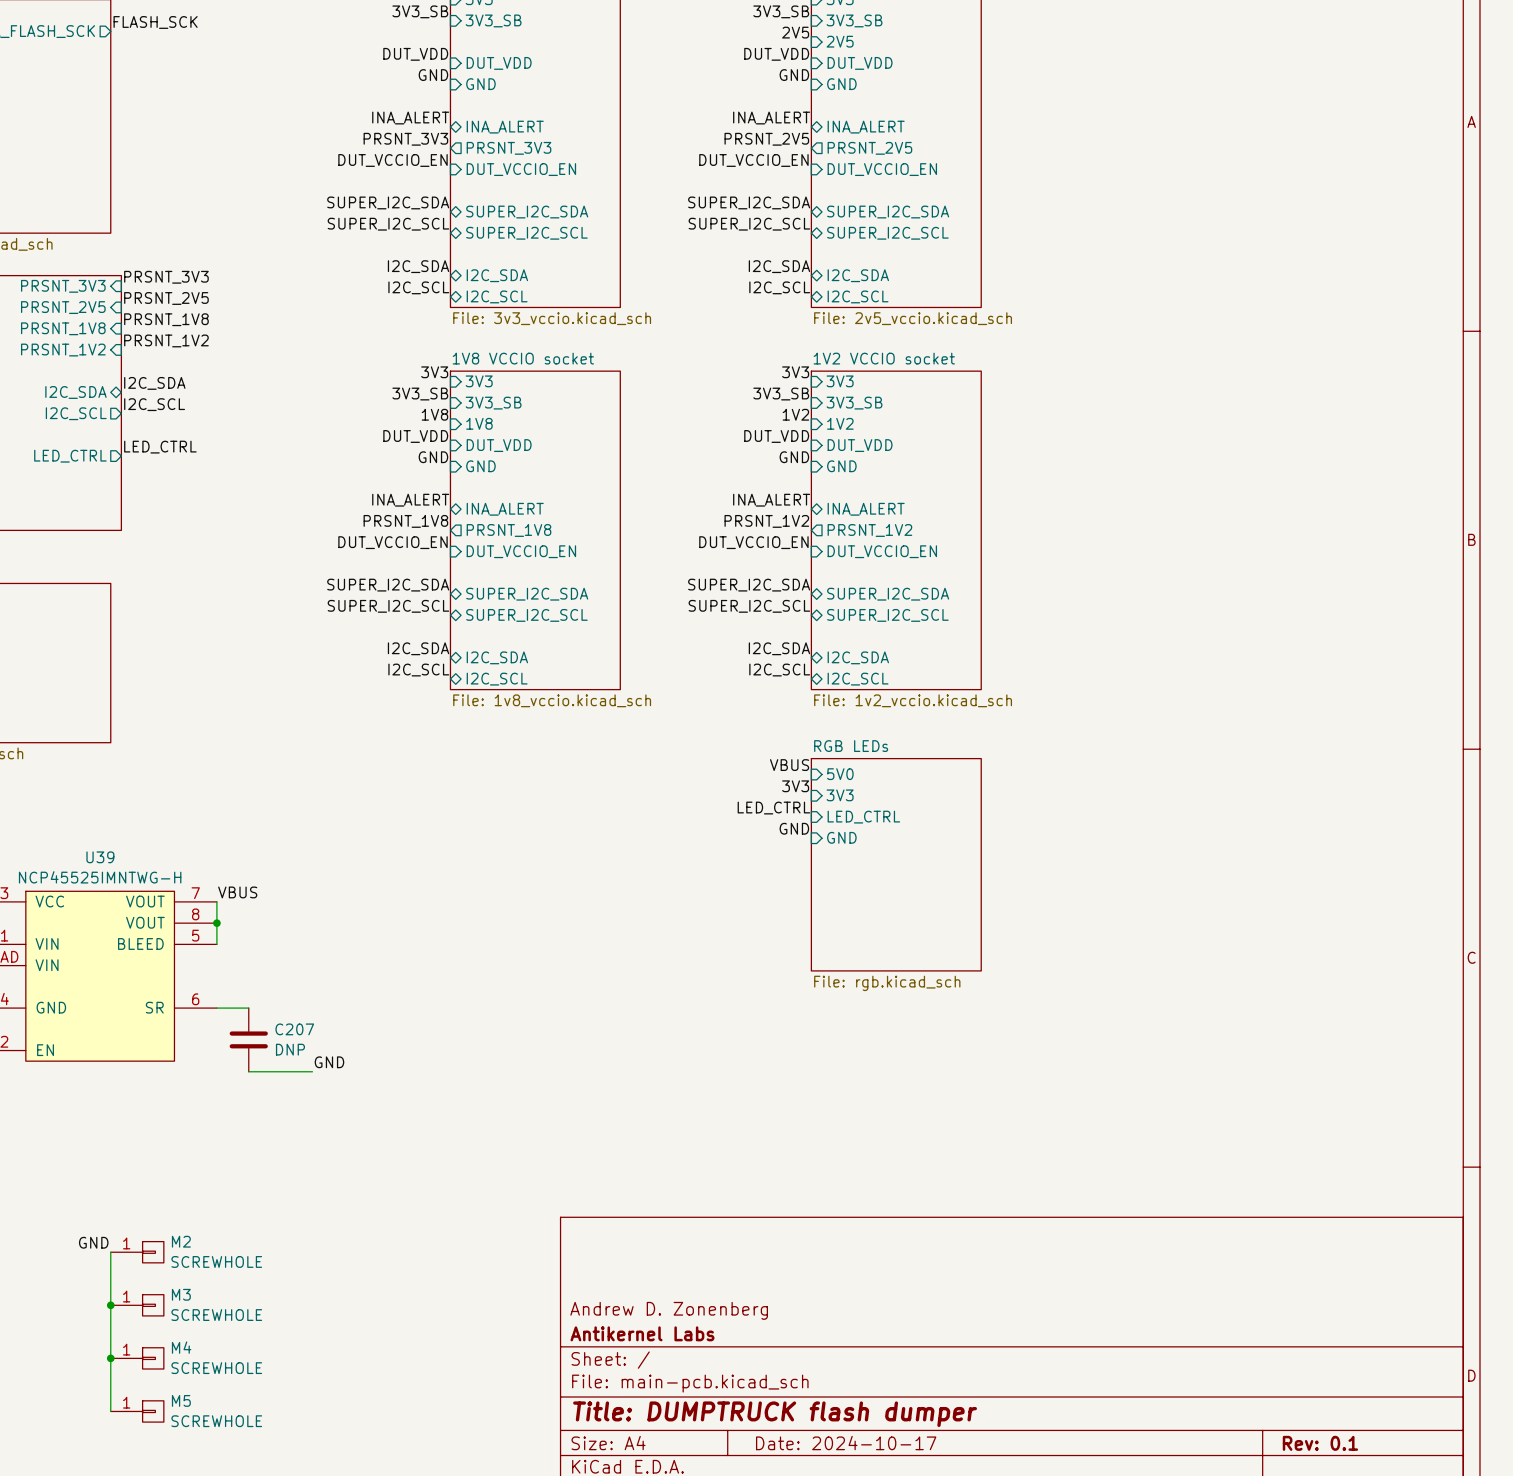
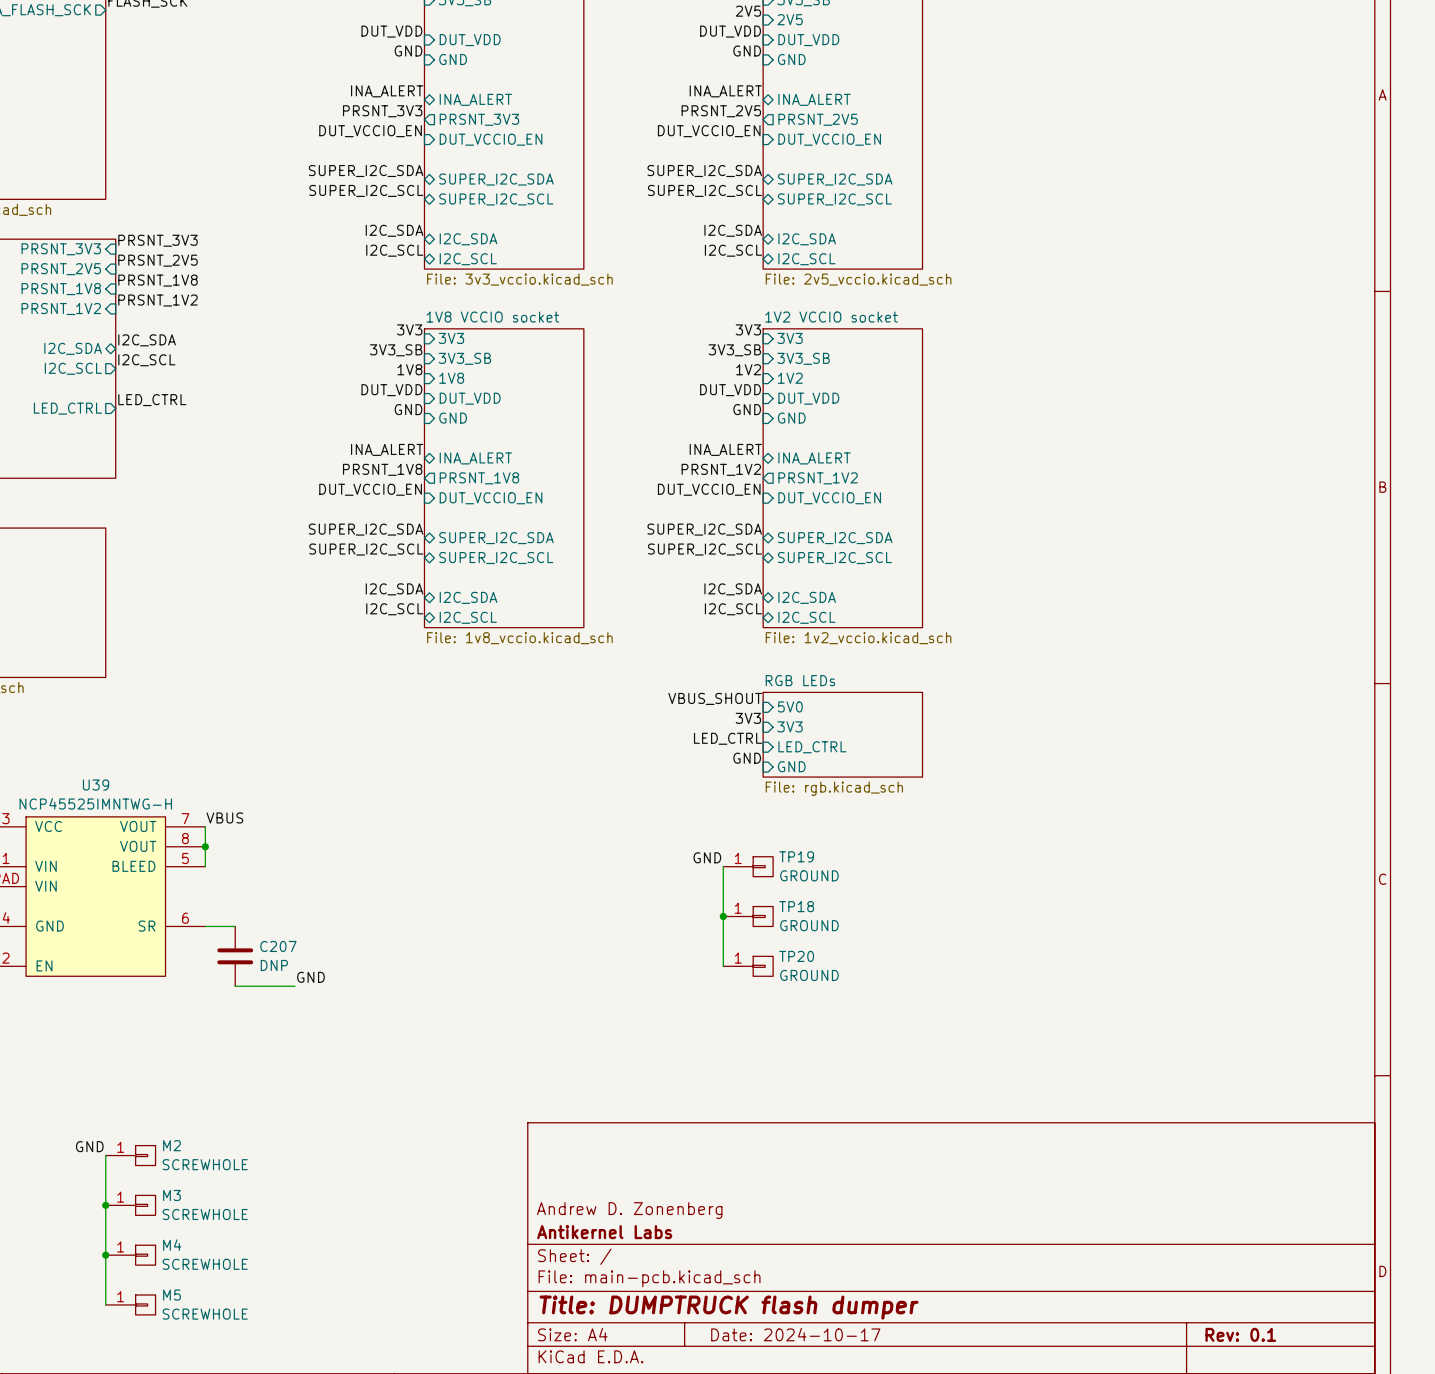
label: VBUS (789, 765) -> VBUS_SHOUT (715, 698)
sheet RGB LEDs: none -> File: rgb.kicad_sch (842, 734)
sheet RGB LEDs: File: rgb.kicad_sch (896, 864) -> none
label: none -> GND (707, 857)
wire: none -> (723, 866) (723, 966)
TP19: none -> GROUND (748, 866)
junction: none -> (723, 916)
TP18: none -> GROUND (748, 916)
TP20: none -> GROUND (748, 966)

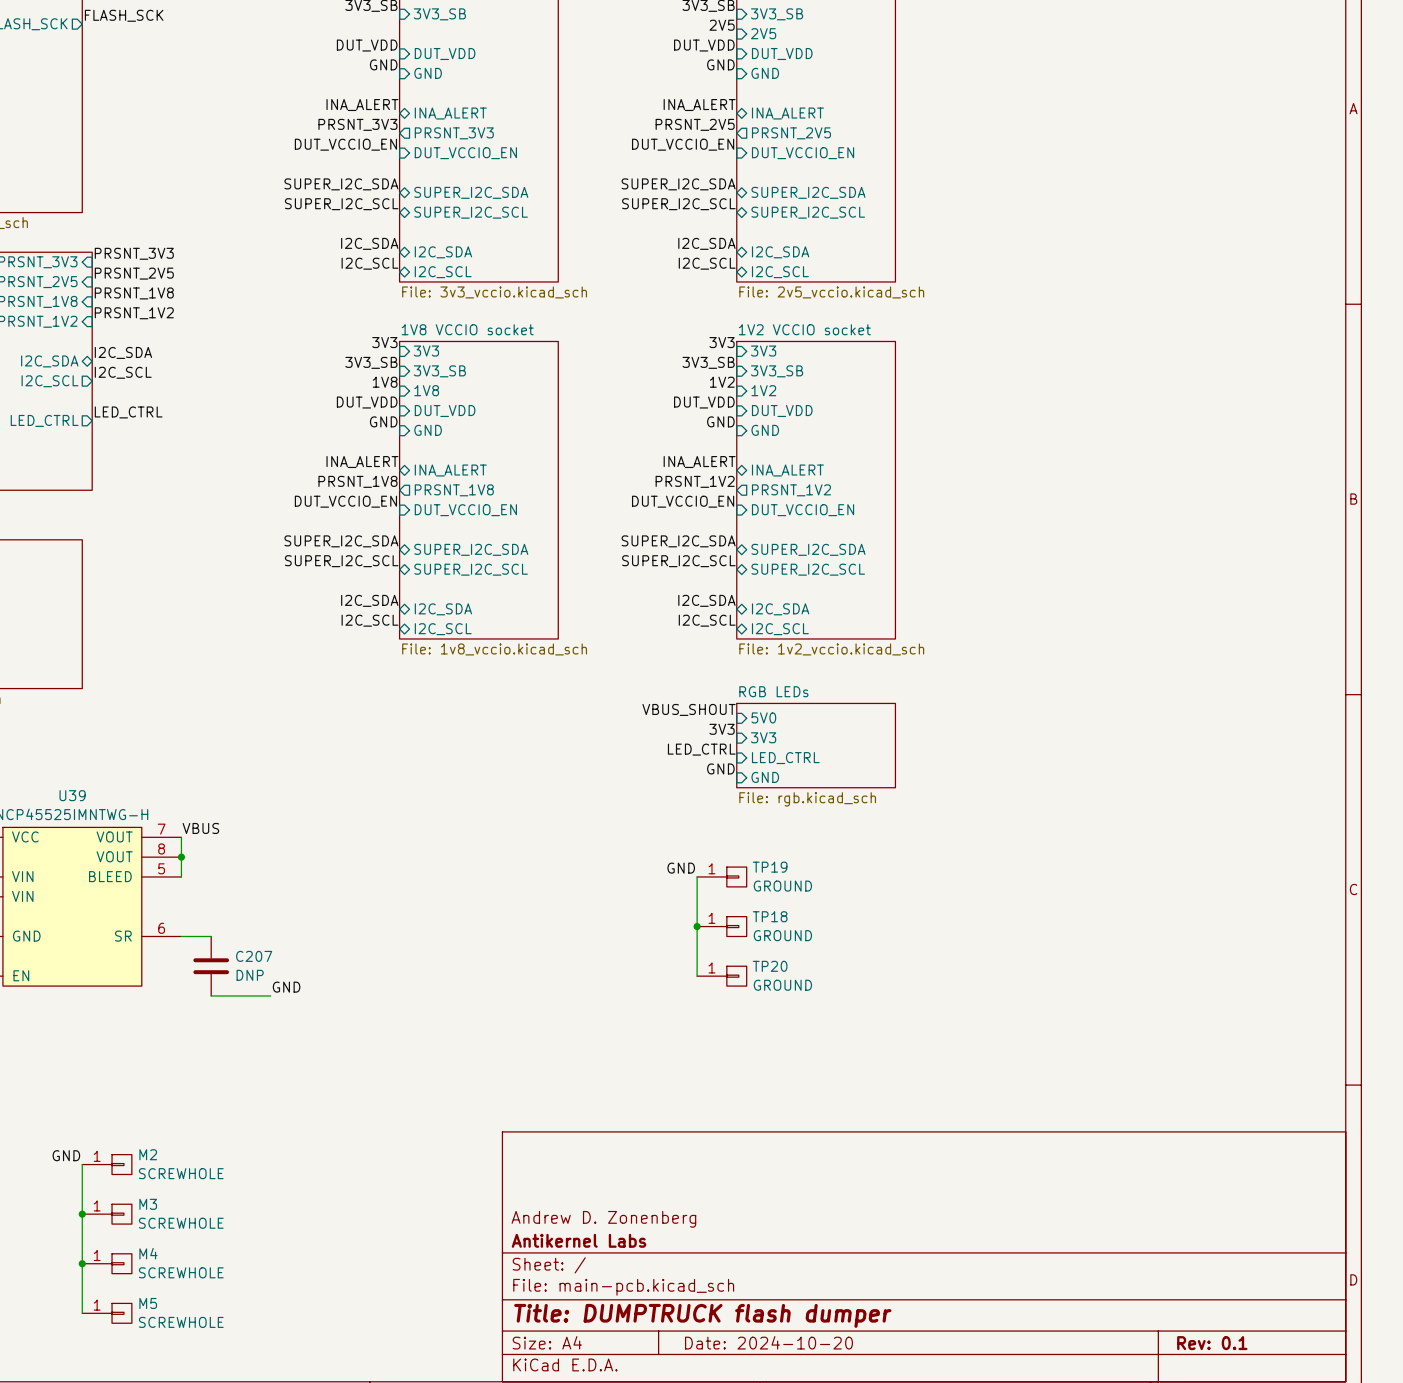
title block: Date: 2024-10-17 (795, 1334) -> Date: 2024-10-20 (768, 1342)

